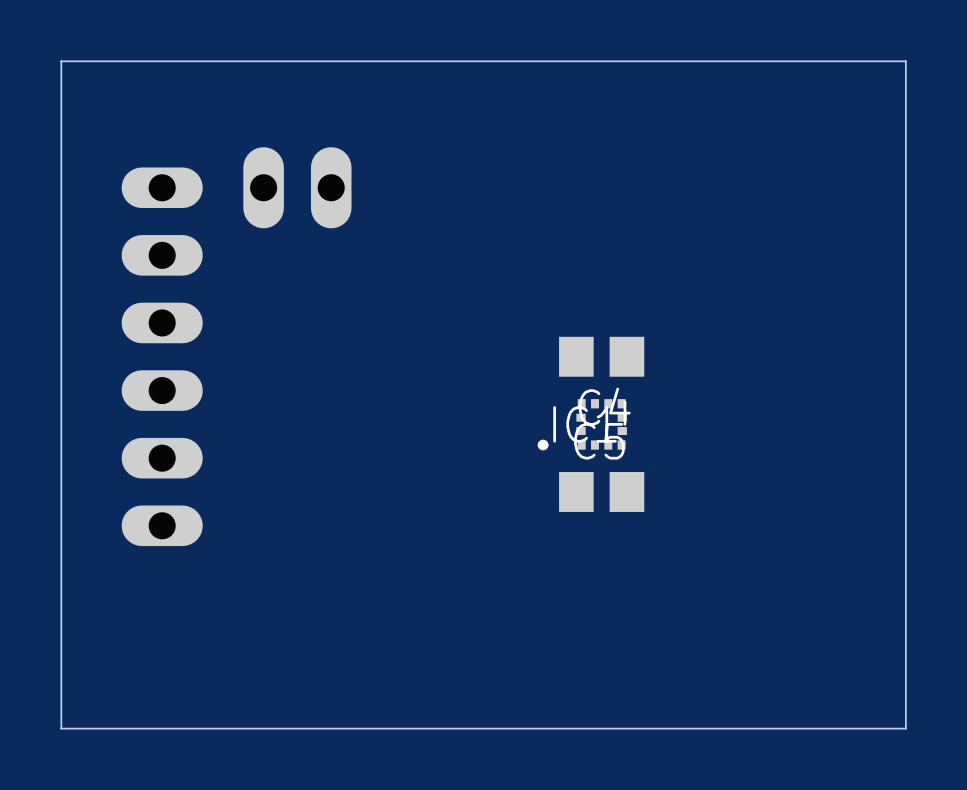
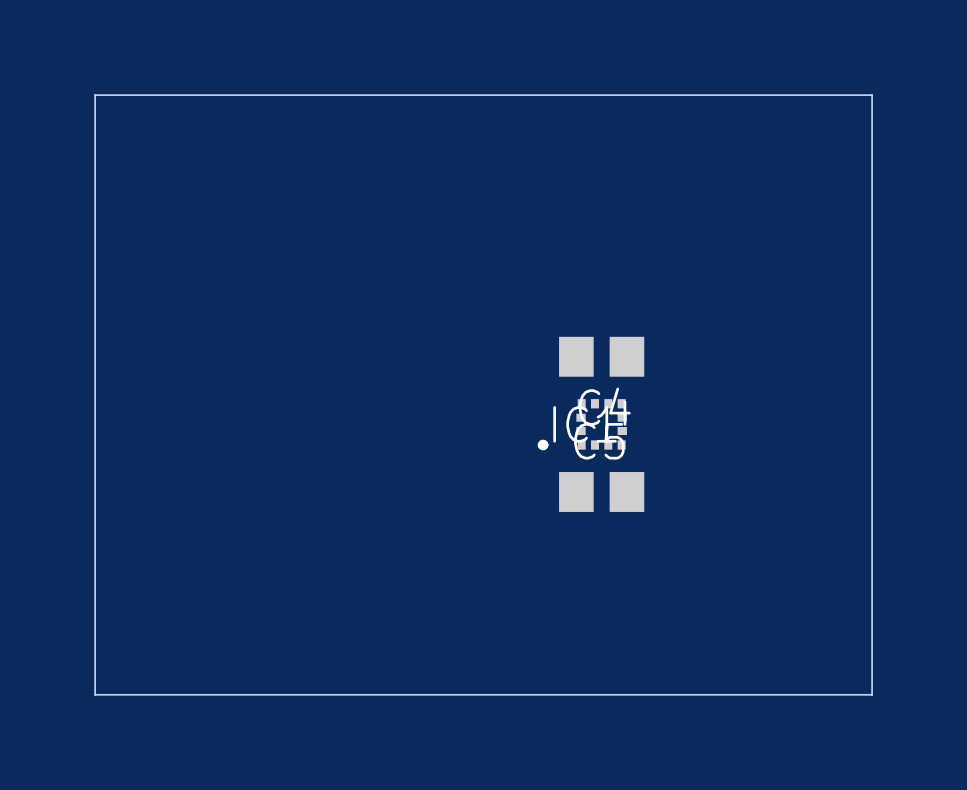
board edge: (905, 61) (61, 61) (61, 728) (905, 728) (905, 61) -> (872, 95) (872, 694) (95, 694) (95, 95) (872, 95)
part: (297, 187) -> none
part: (162, 356) -> none

